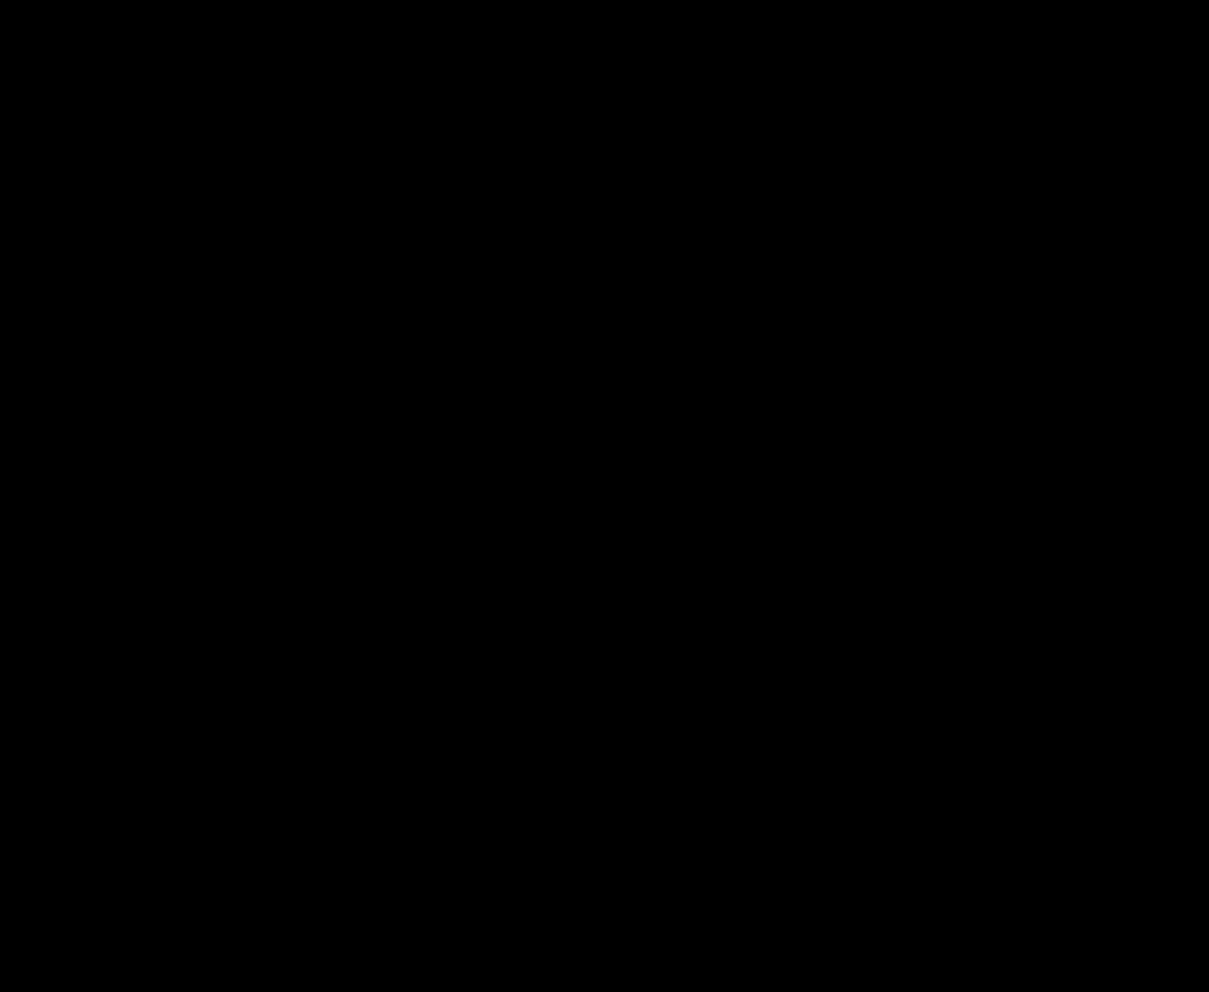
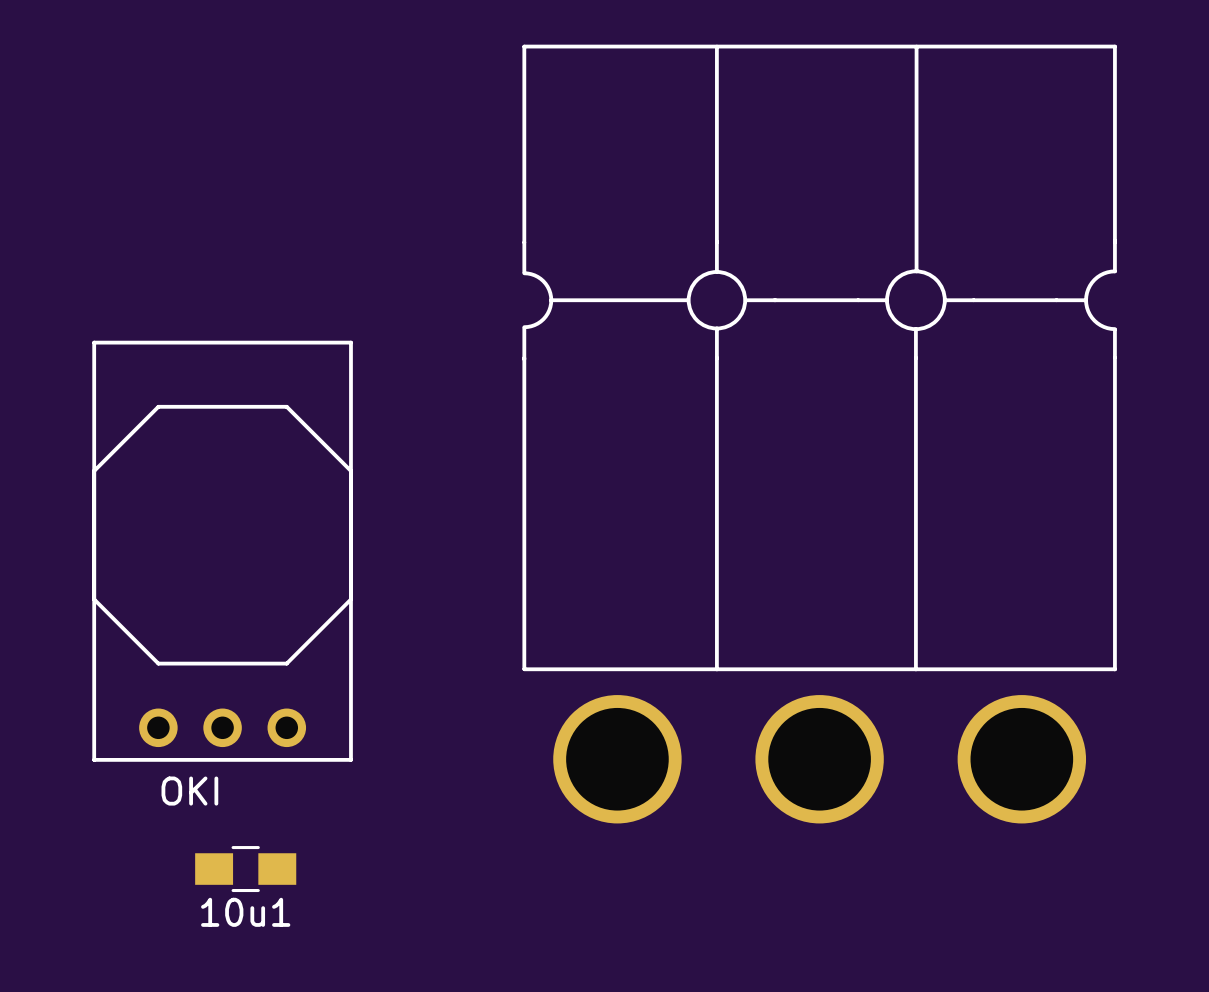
part: none -> (819, 434)
part: none -> OKI (222, 551)
10u1: none -> (245, 869)

